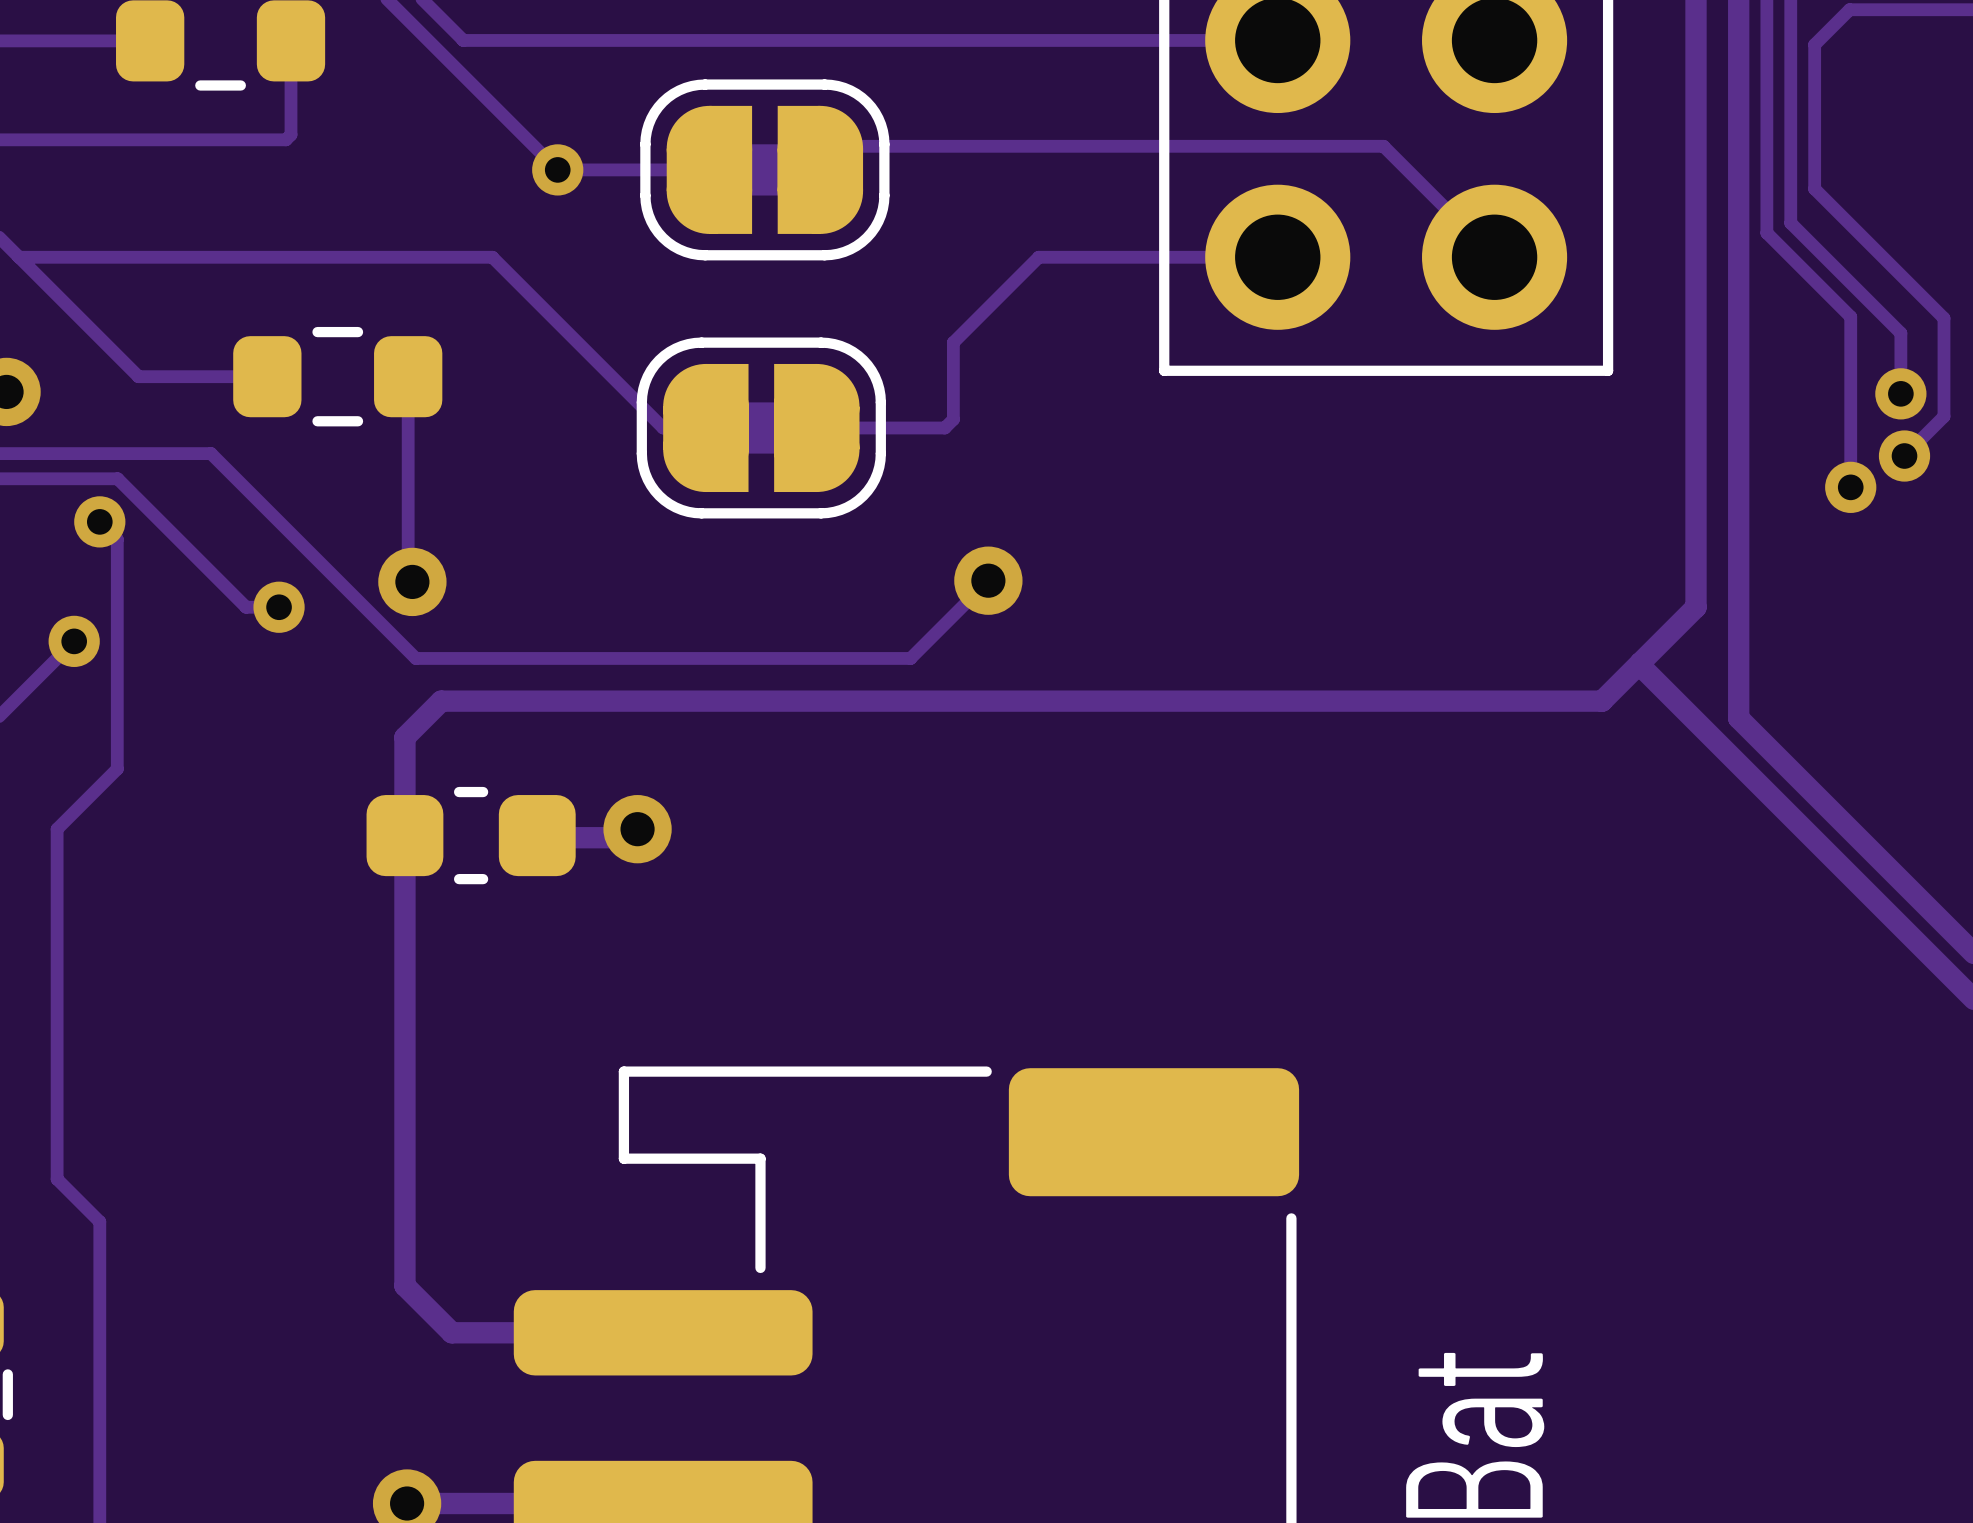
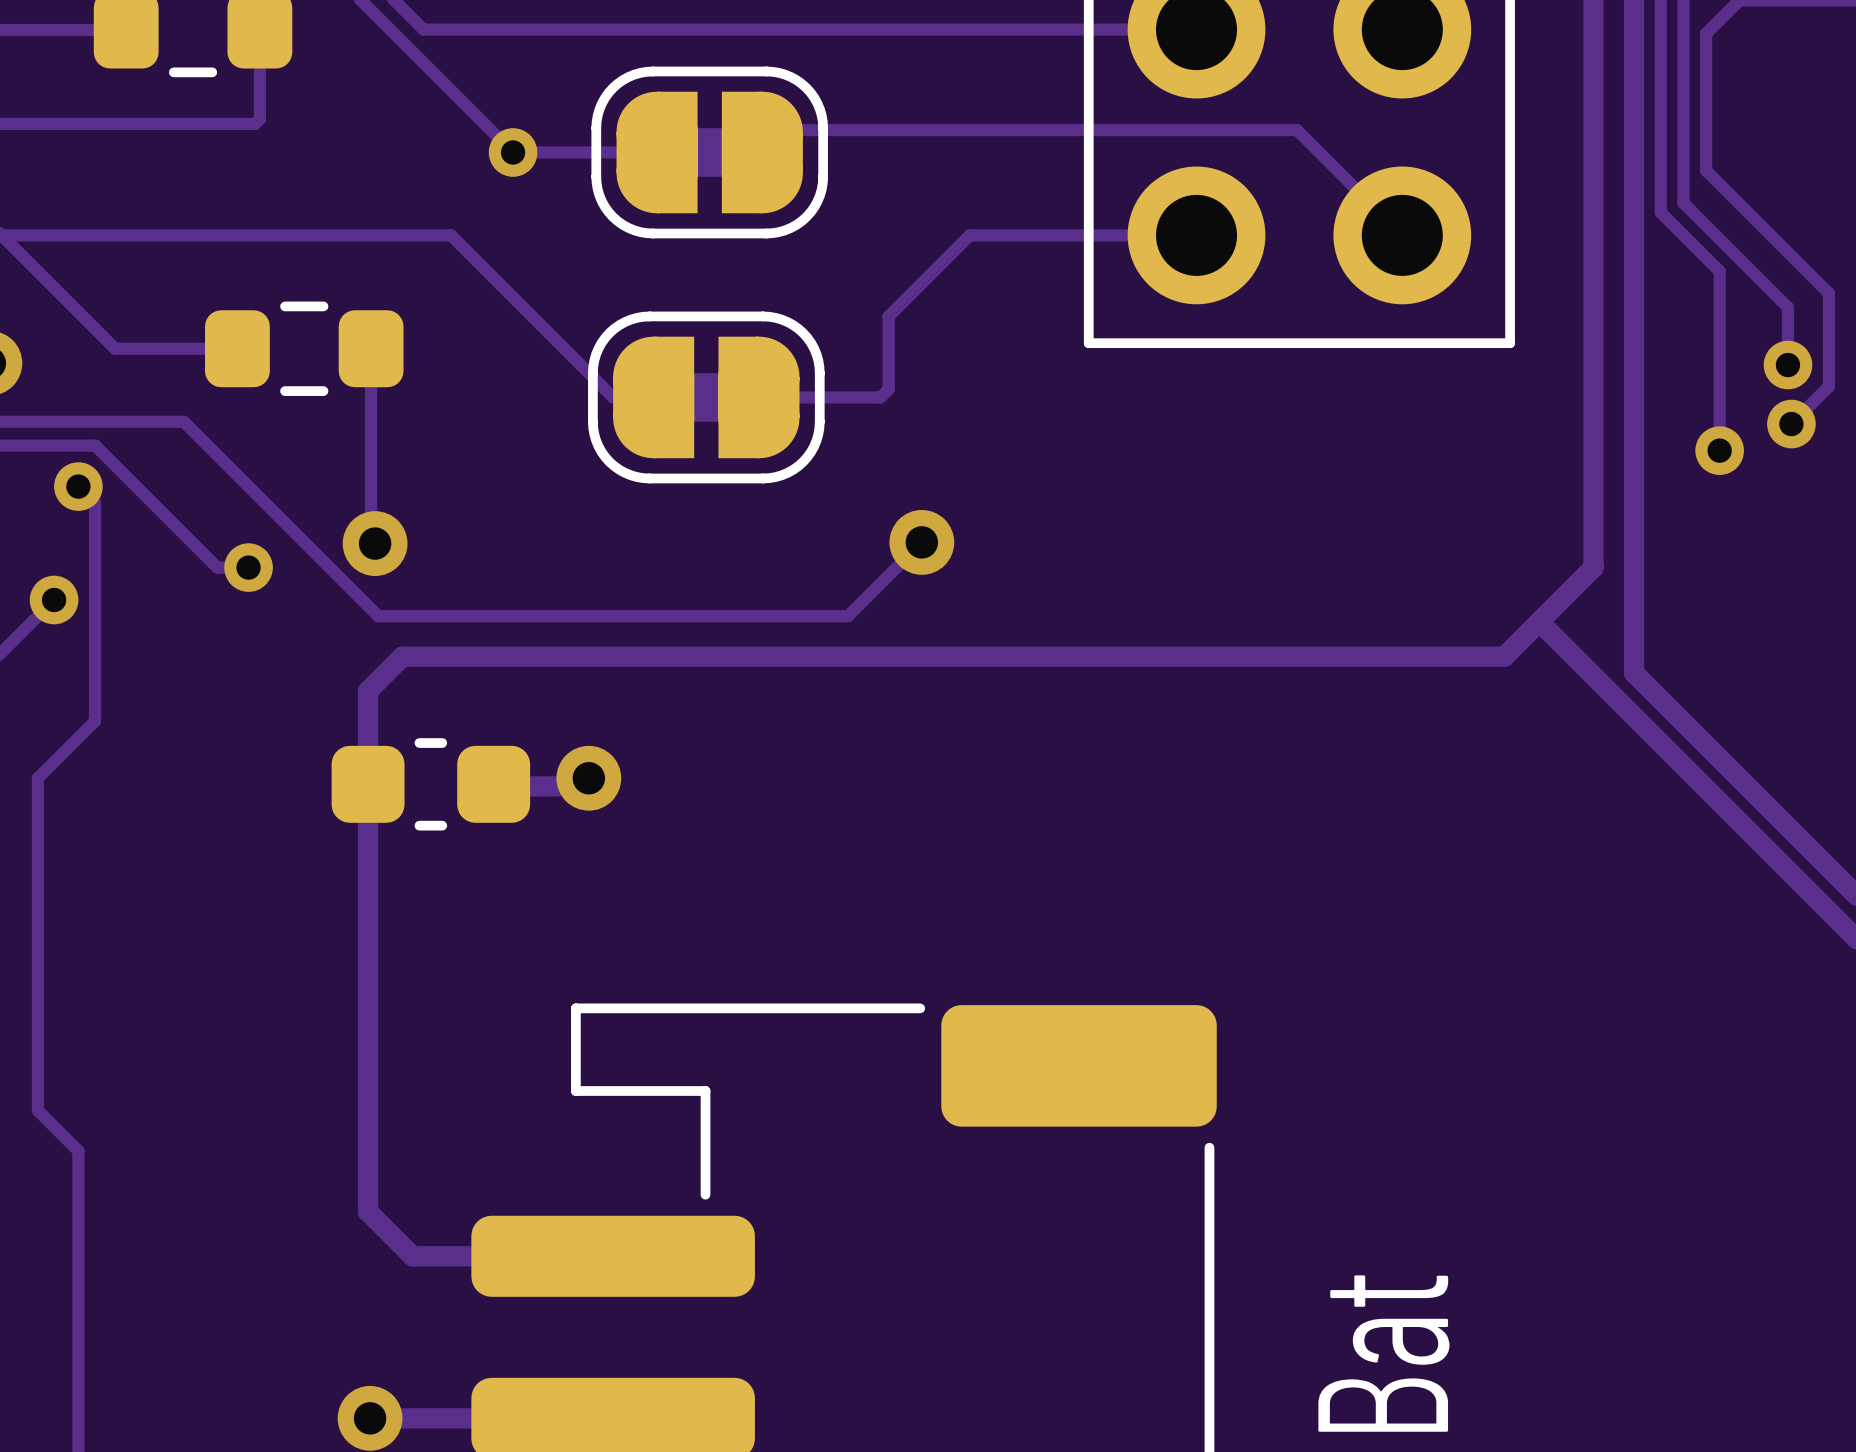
track: (1828, 295) (1850, 316) (1850, 487) -> (1719, 271) (1719, 450)
via position: (1850, 487) -> (1719, 450)

